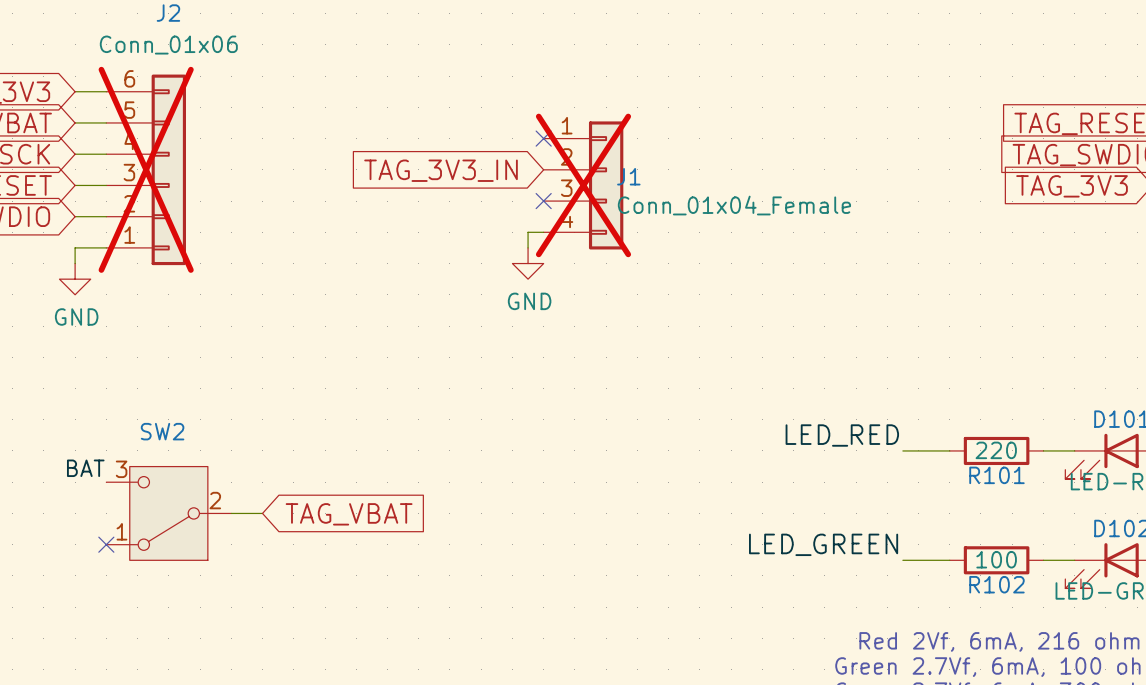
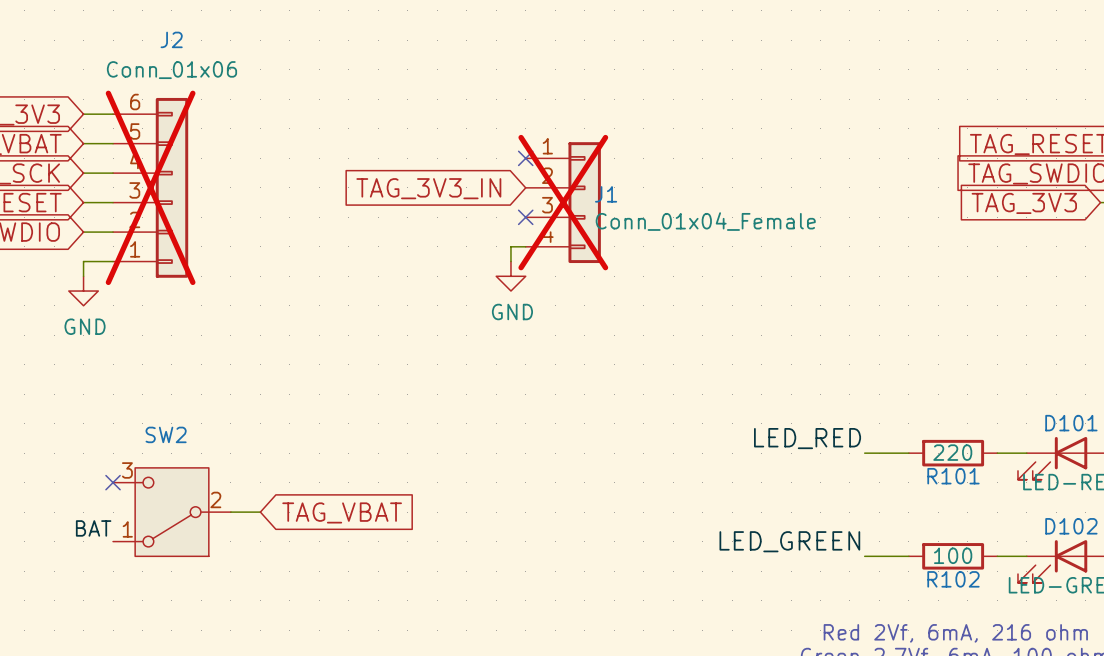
label position: BAT (85, 468) -> BAT (93, 528)
no-connect mark position: (106, 544) -> (113, 482)

